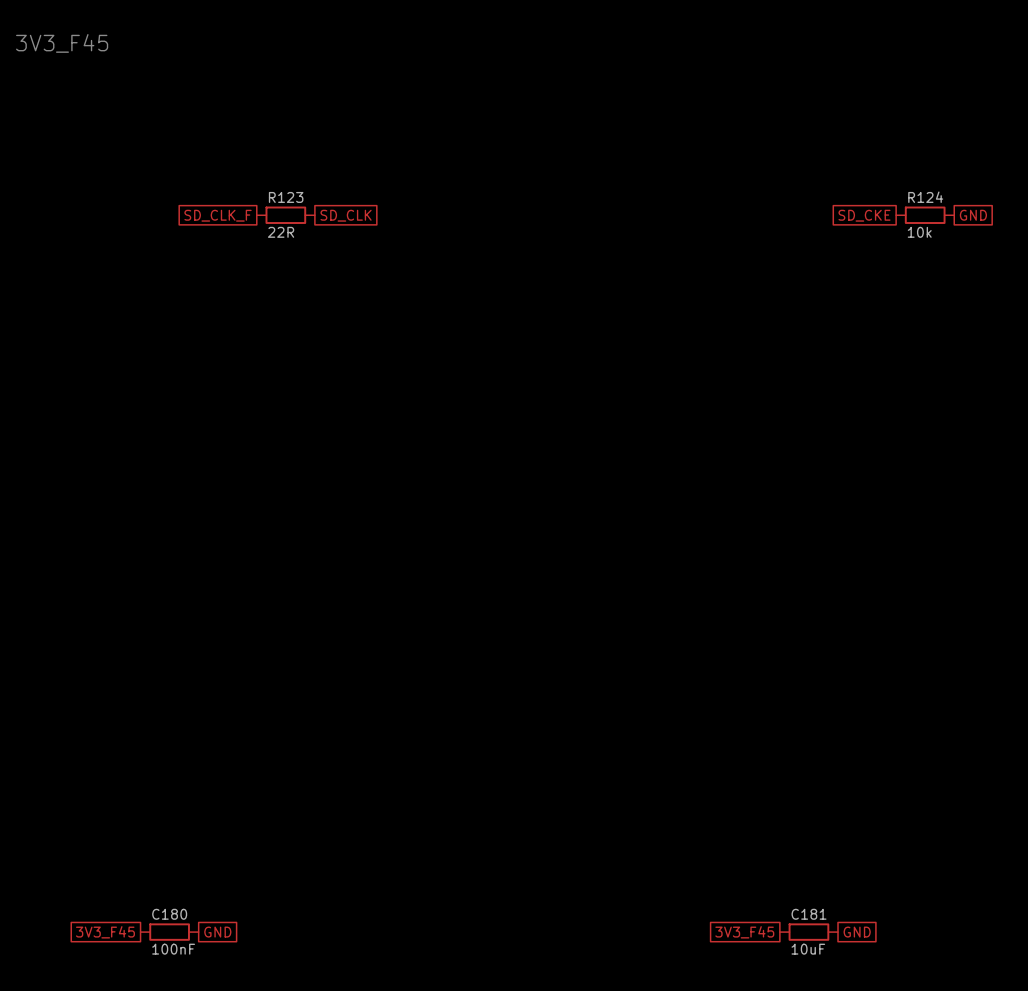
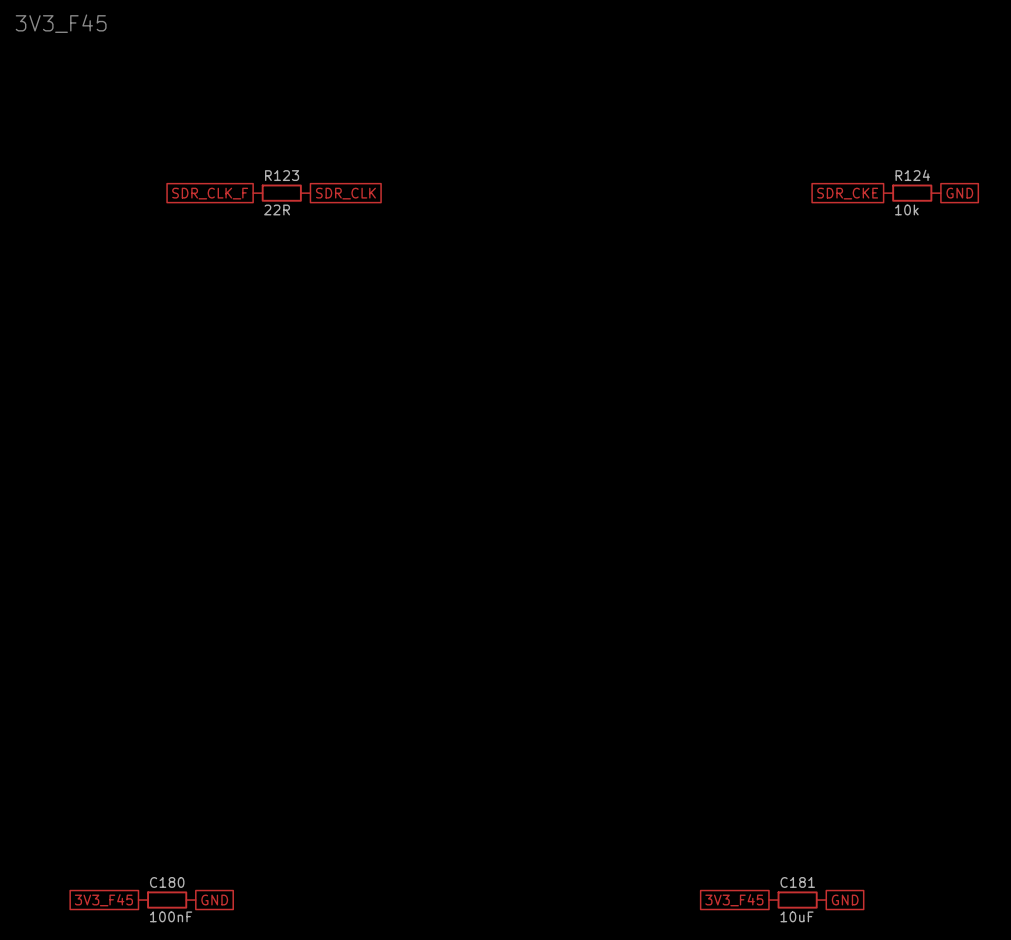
global label: SD_CLK_F (218, 215) -> SDR_CLK_F (210, 193)
global label: SD_CLK (346, 215) -> SDR_CLK (345, 193)
global label: SD_CKE (864, 215) -> SDR_CKE (847, 193)

